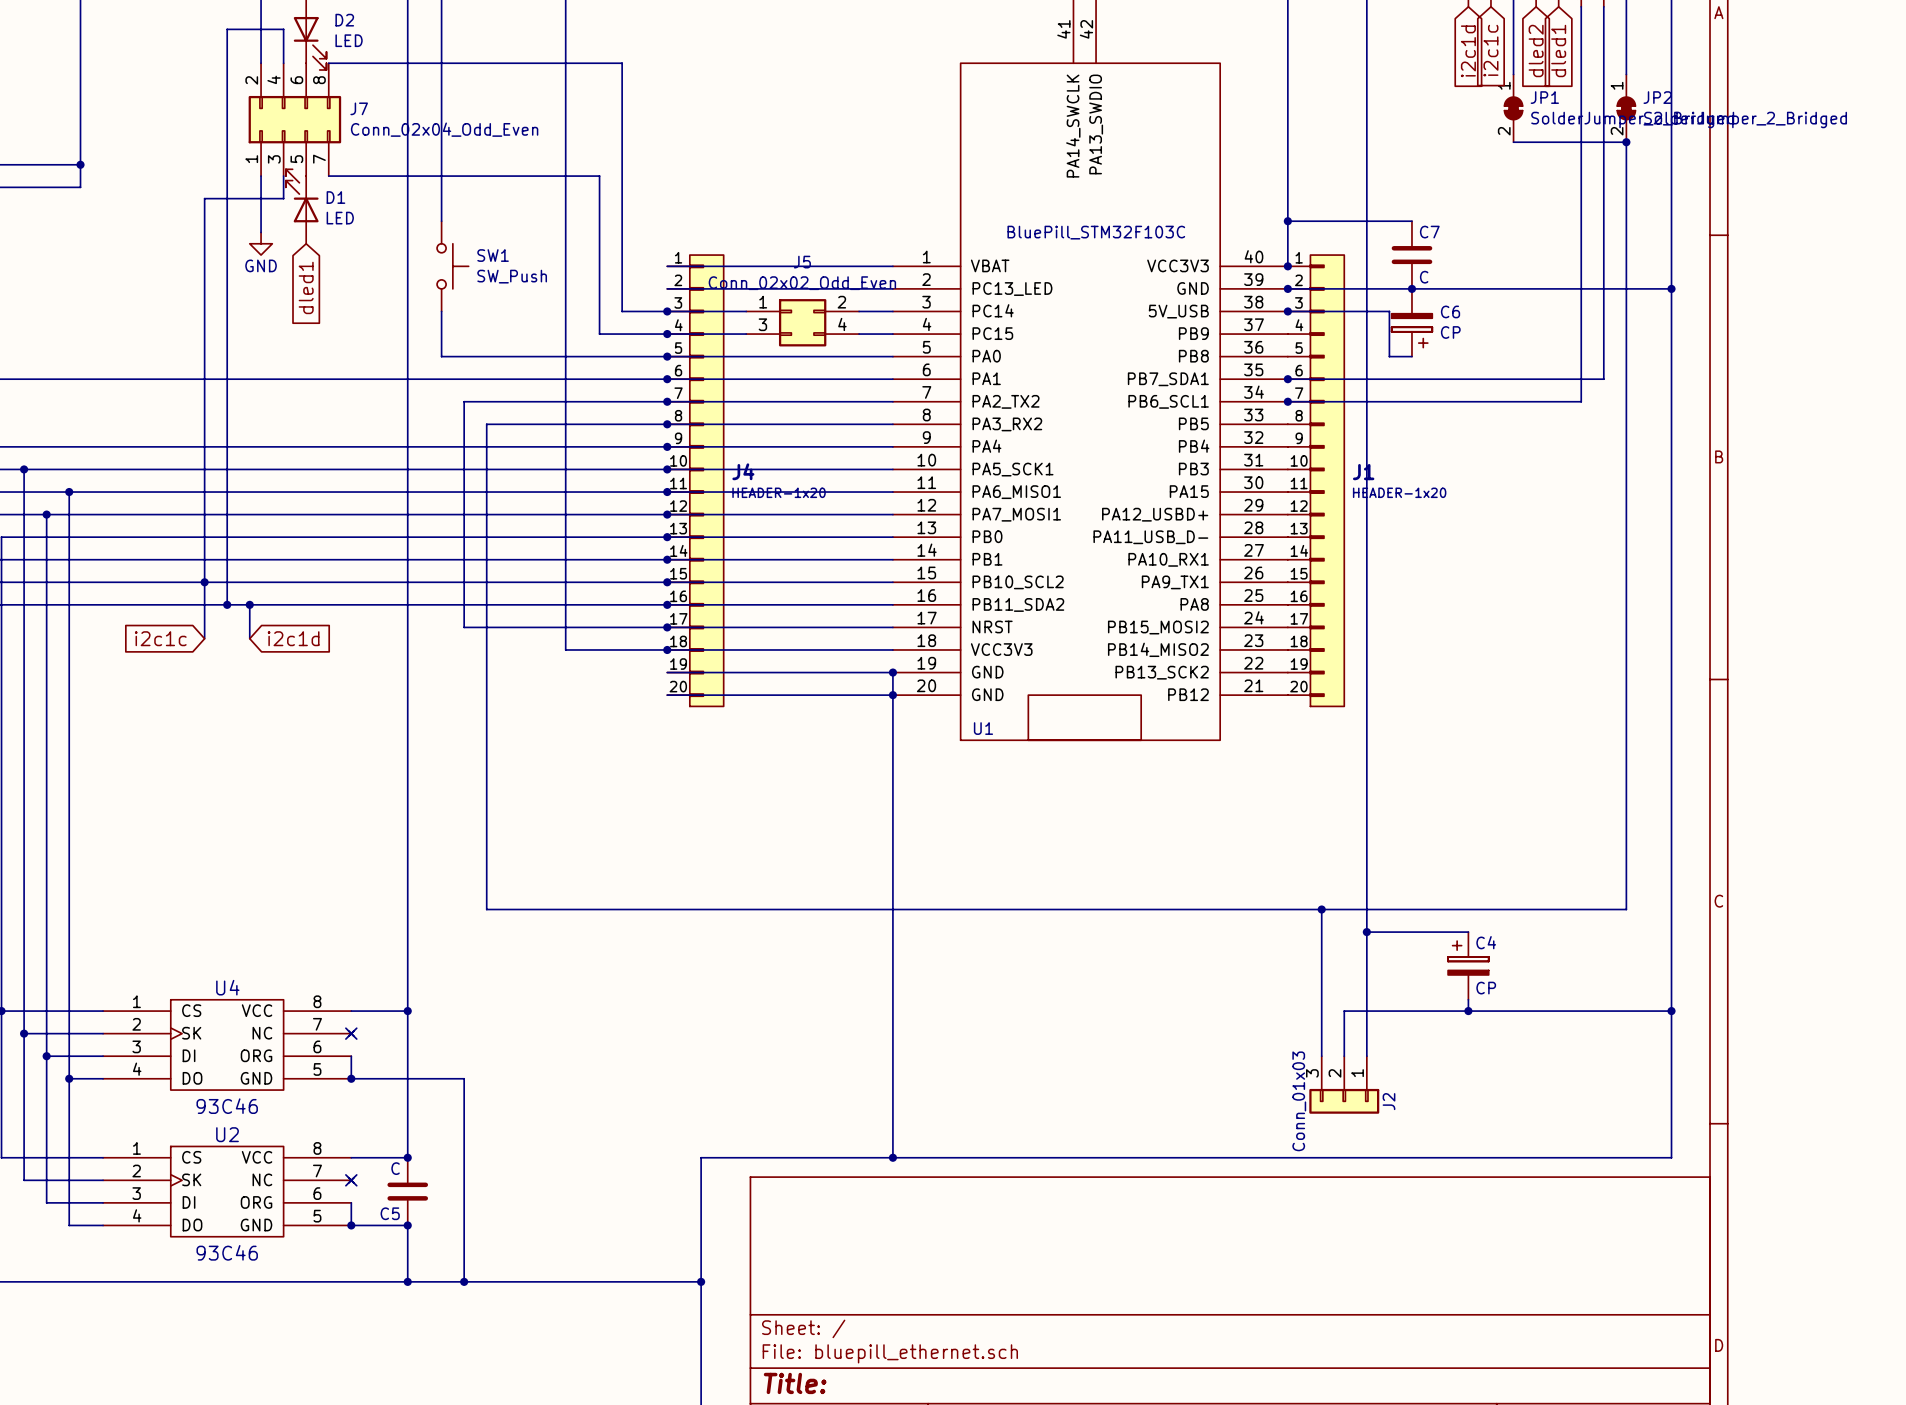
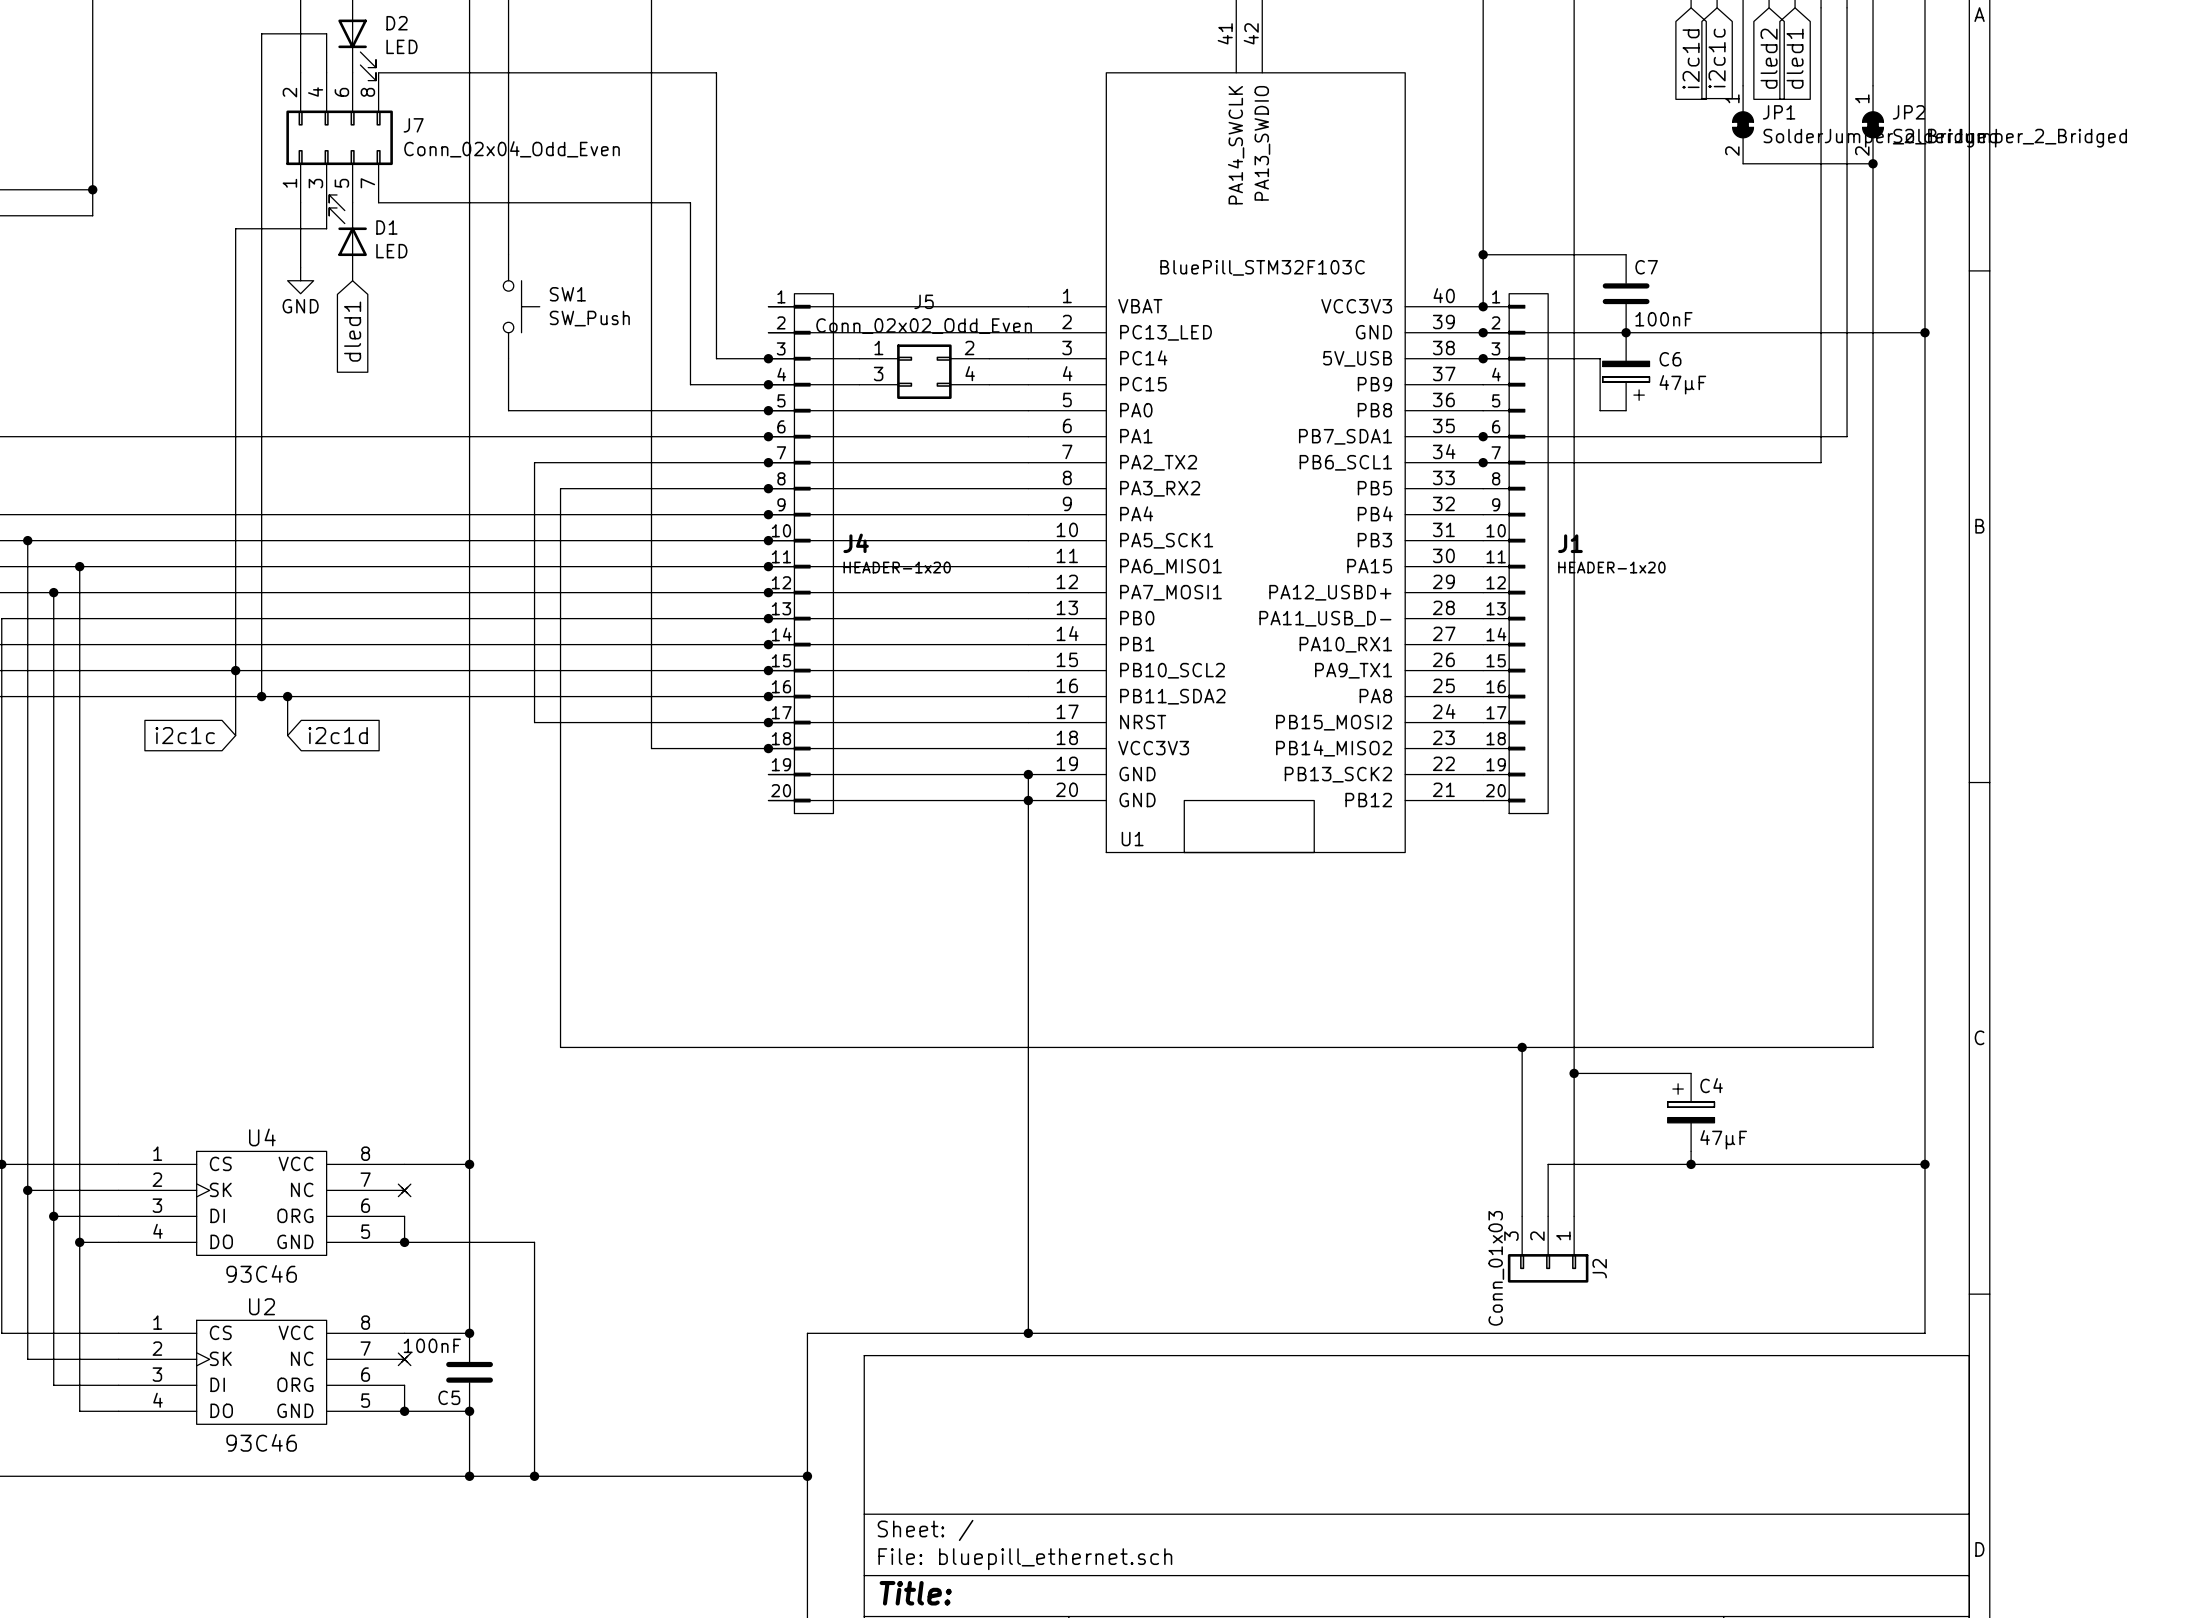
C7 value: C (1424, 277) -> 100nF (1663, 319)
C6 value: CP (1450, 332) -> 47µF (1682, 384)
C4 value: CP (1486, 988) -> 47µF (1723, 1139)
C5 value: C (395, 1168) -> 100nF (432, 1345)

